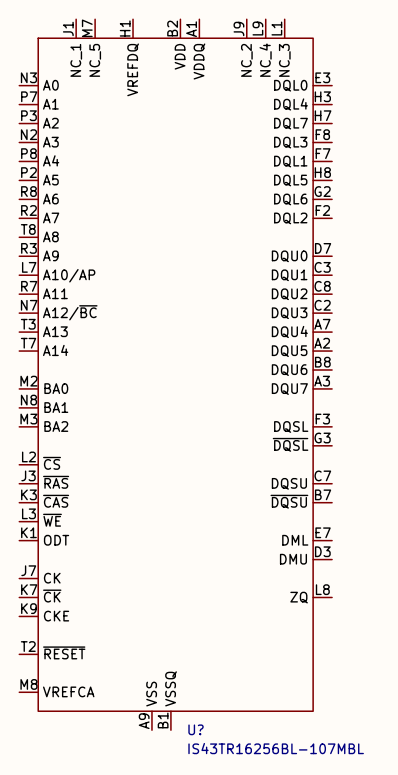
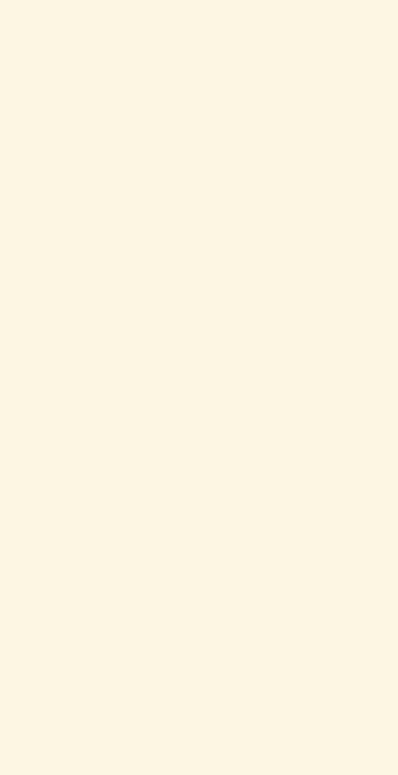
U?: IS43TR16256BL-107MBL (175, 374) -> none

